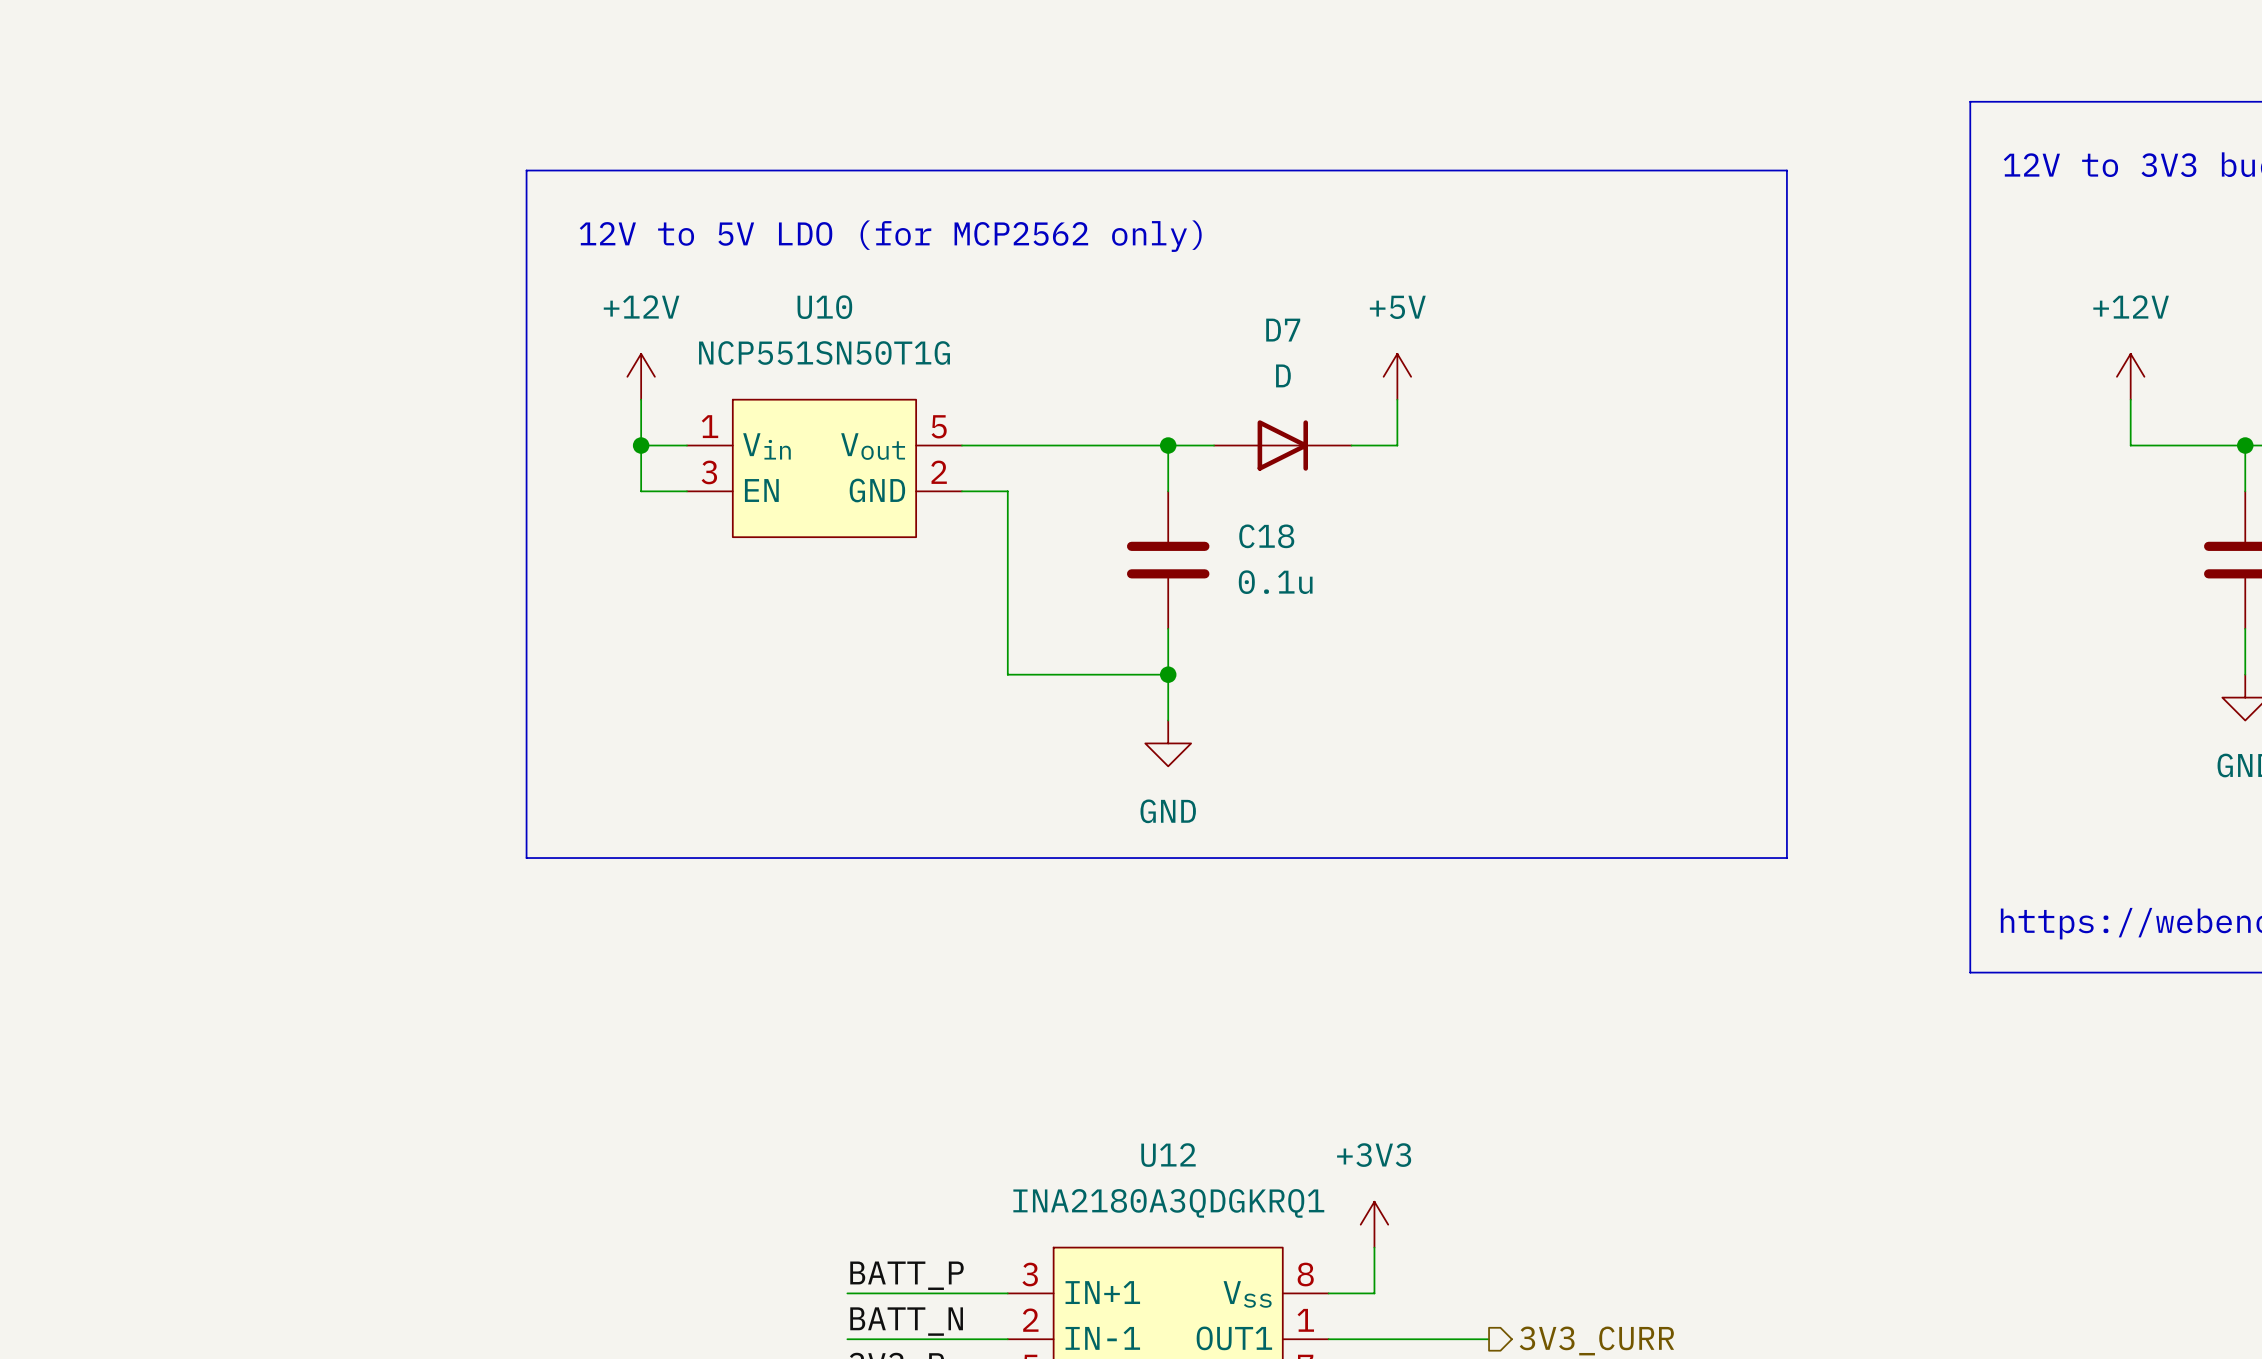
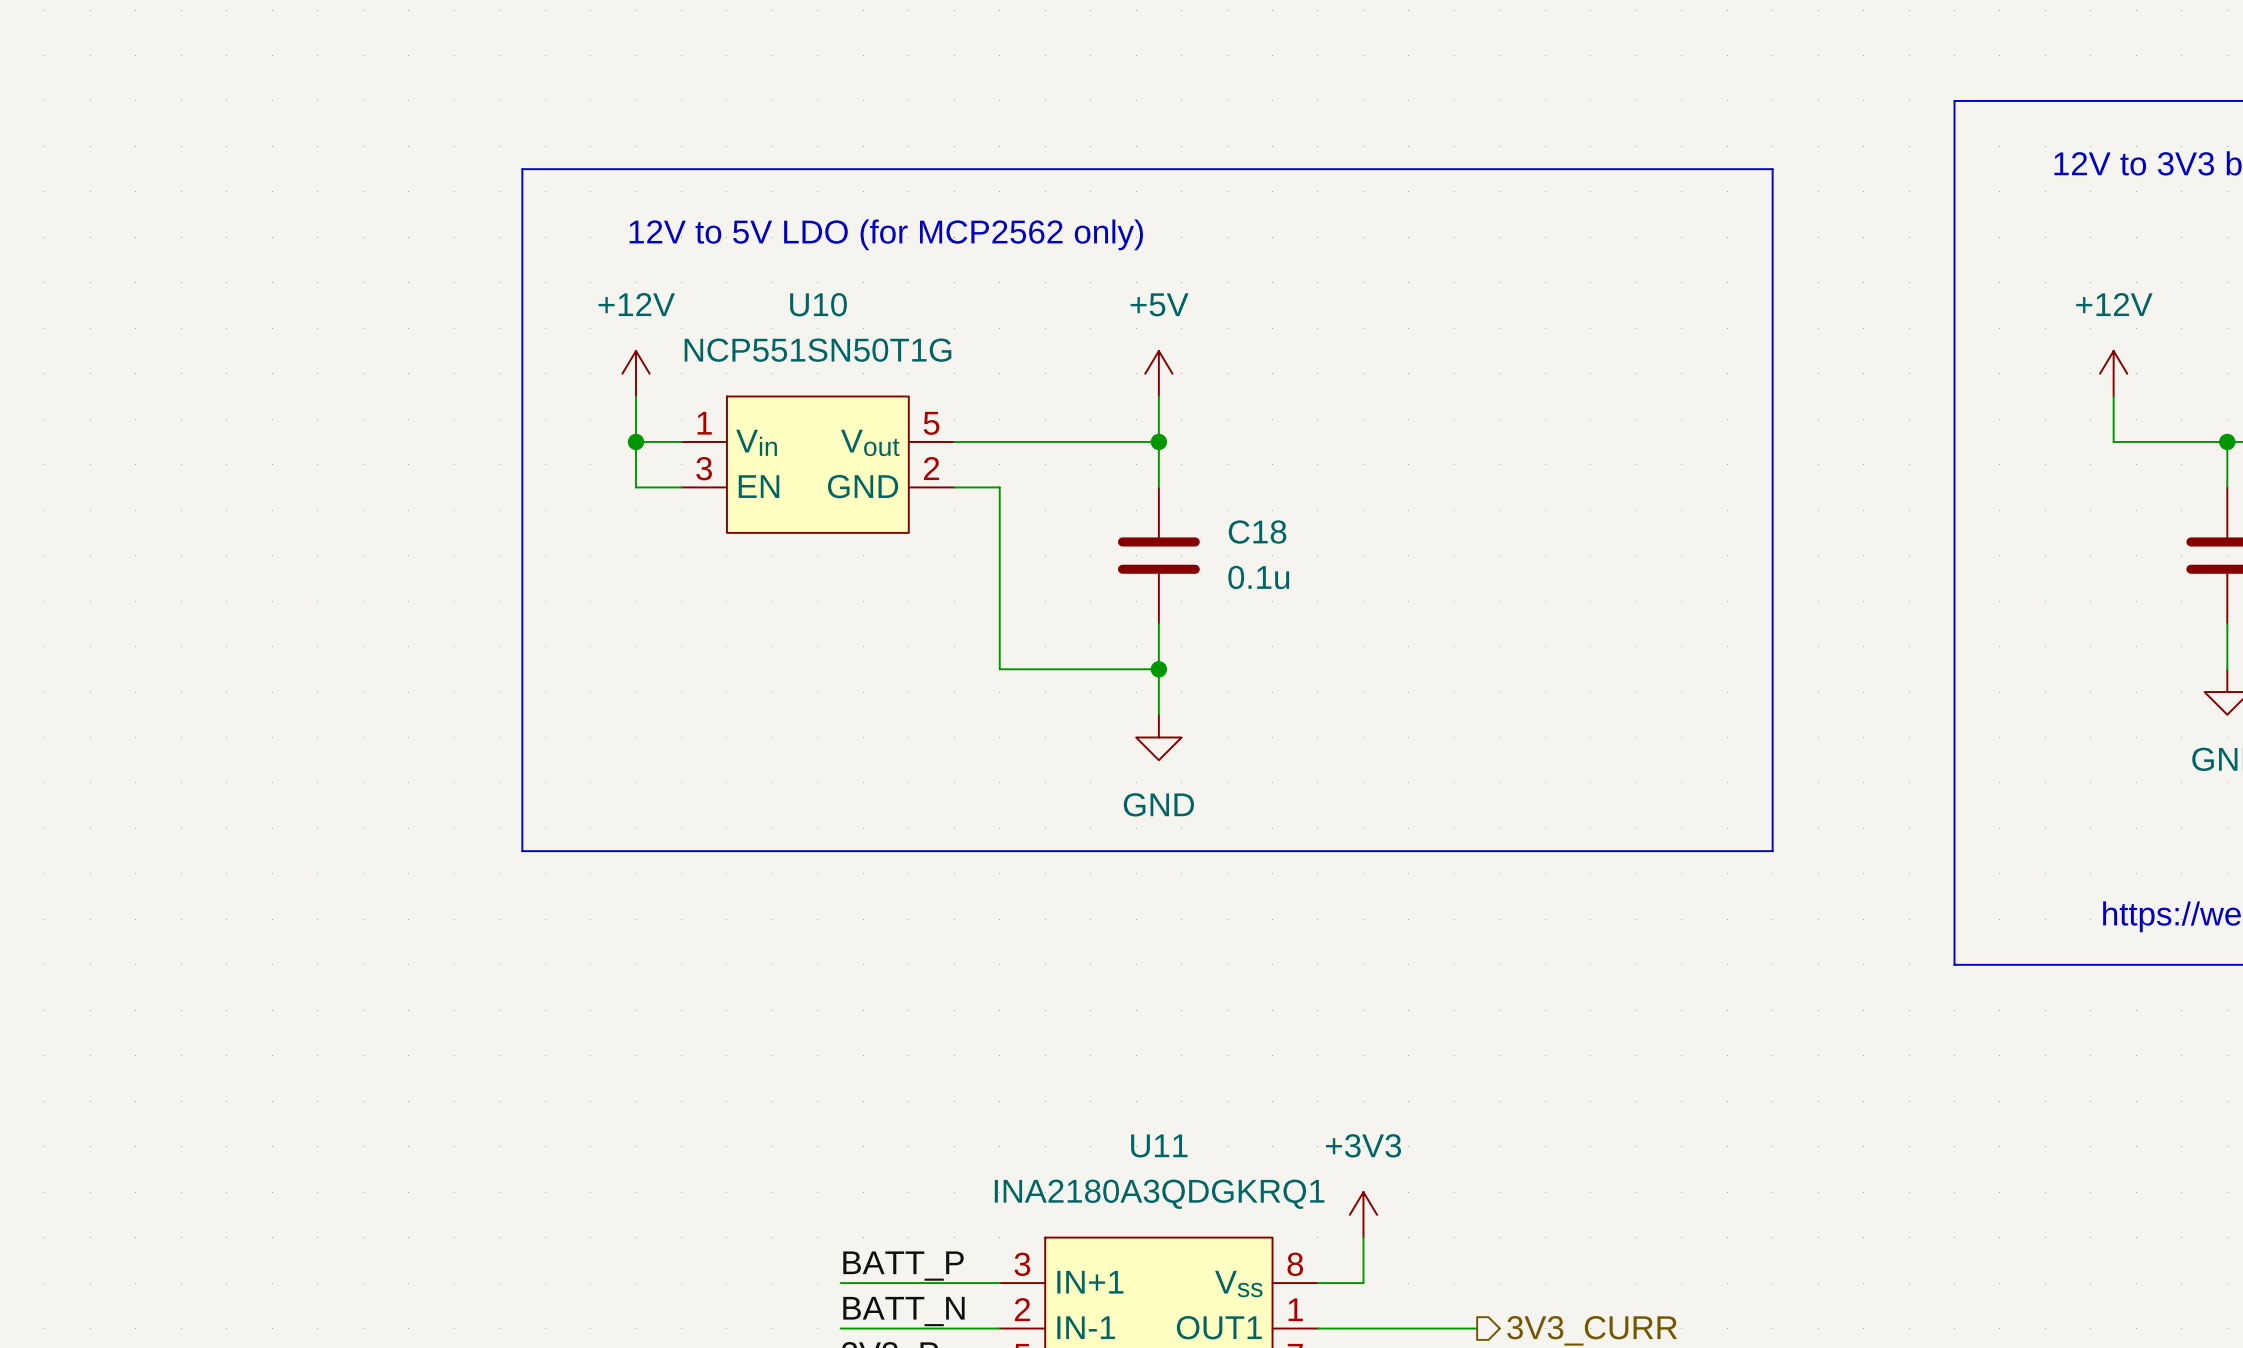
power symbol position: +5V (1397, 376) -> +5V (1158, 373)
wire: (1397, 399) (1397, 445) (1351, 445) -> none
wire: (1168, 445) (1214, 445) -> (1158, 441) (1158, 396)
D7: D (1282, 445) -> none
U12 name: U12 (1168, 1155) -> U11 (1159, 1145)

